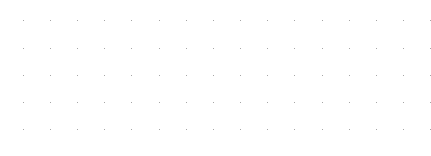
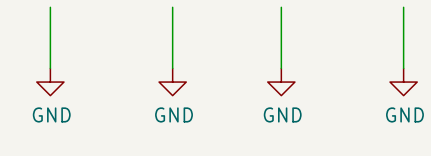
wire: none -> (50, 7) (50, 68)
wire: none -> (172, 7) (172, 68)
wire: none -> (281, 7) (281, 68)
wire: none -> (403, 7) (403, 68)
power symbol: none -> GND (50, 82)
power symbol: none -> GND (172, 82)
power symbol: none -> GND (281, 82)
power symbol: none -> GND (403, 82)

